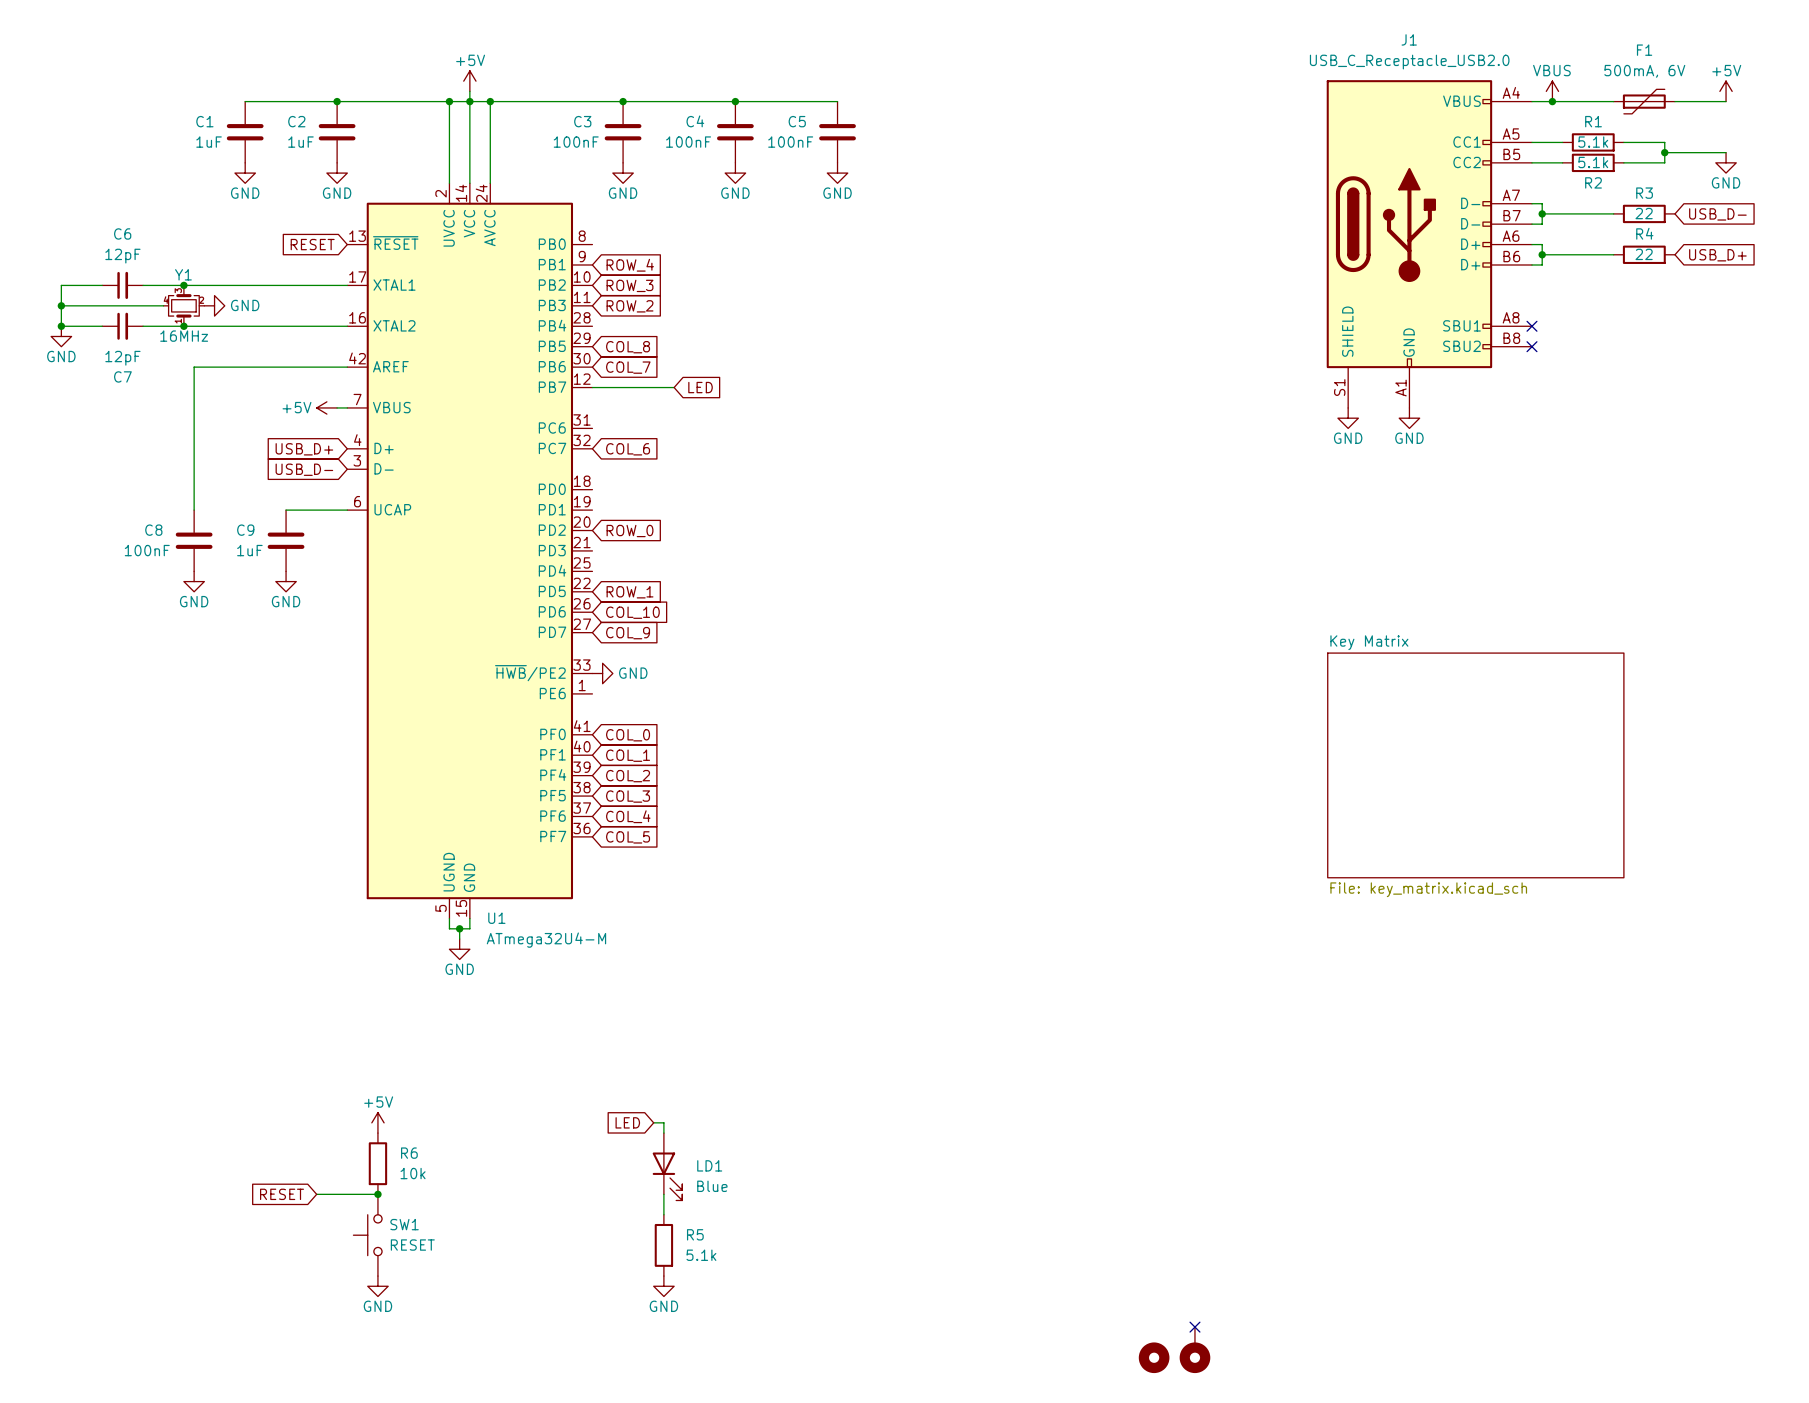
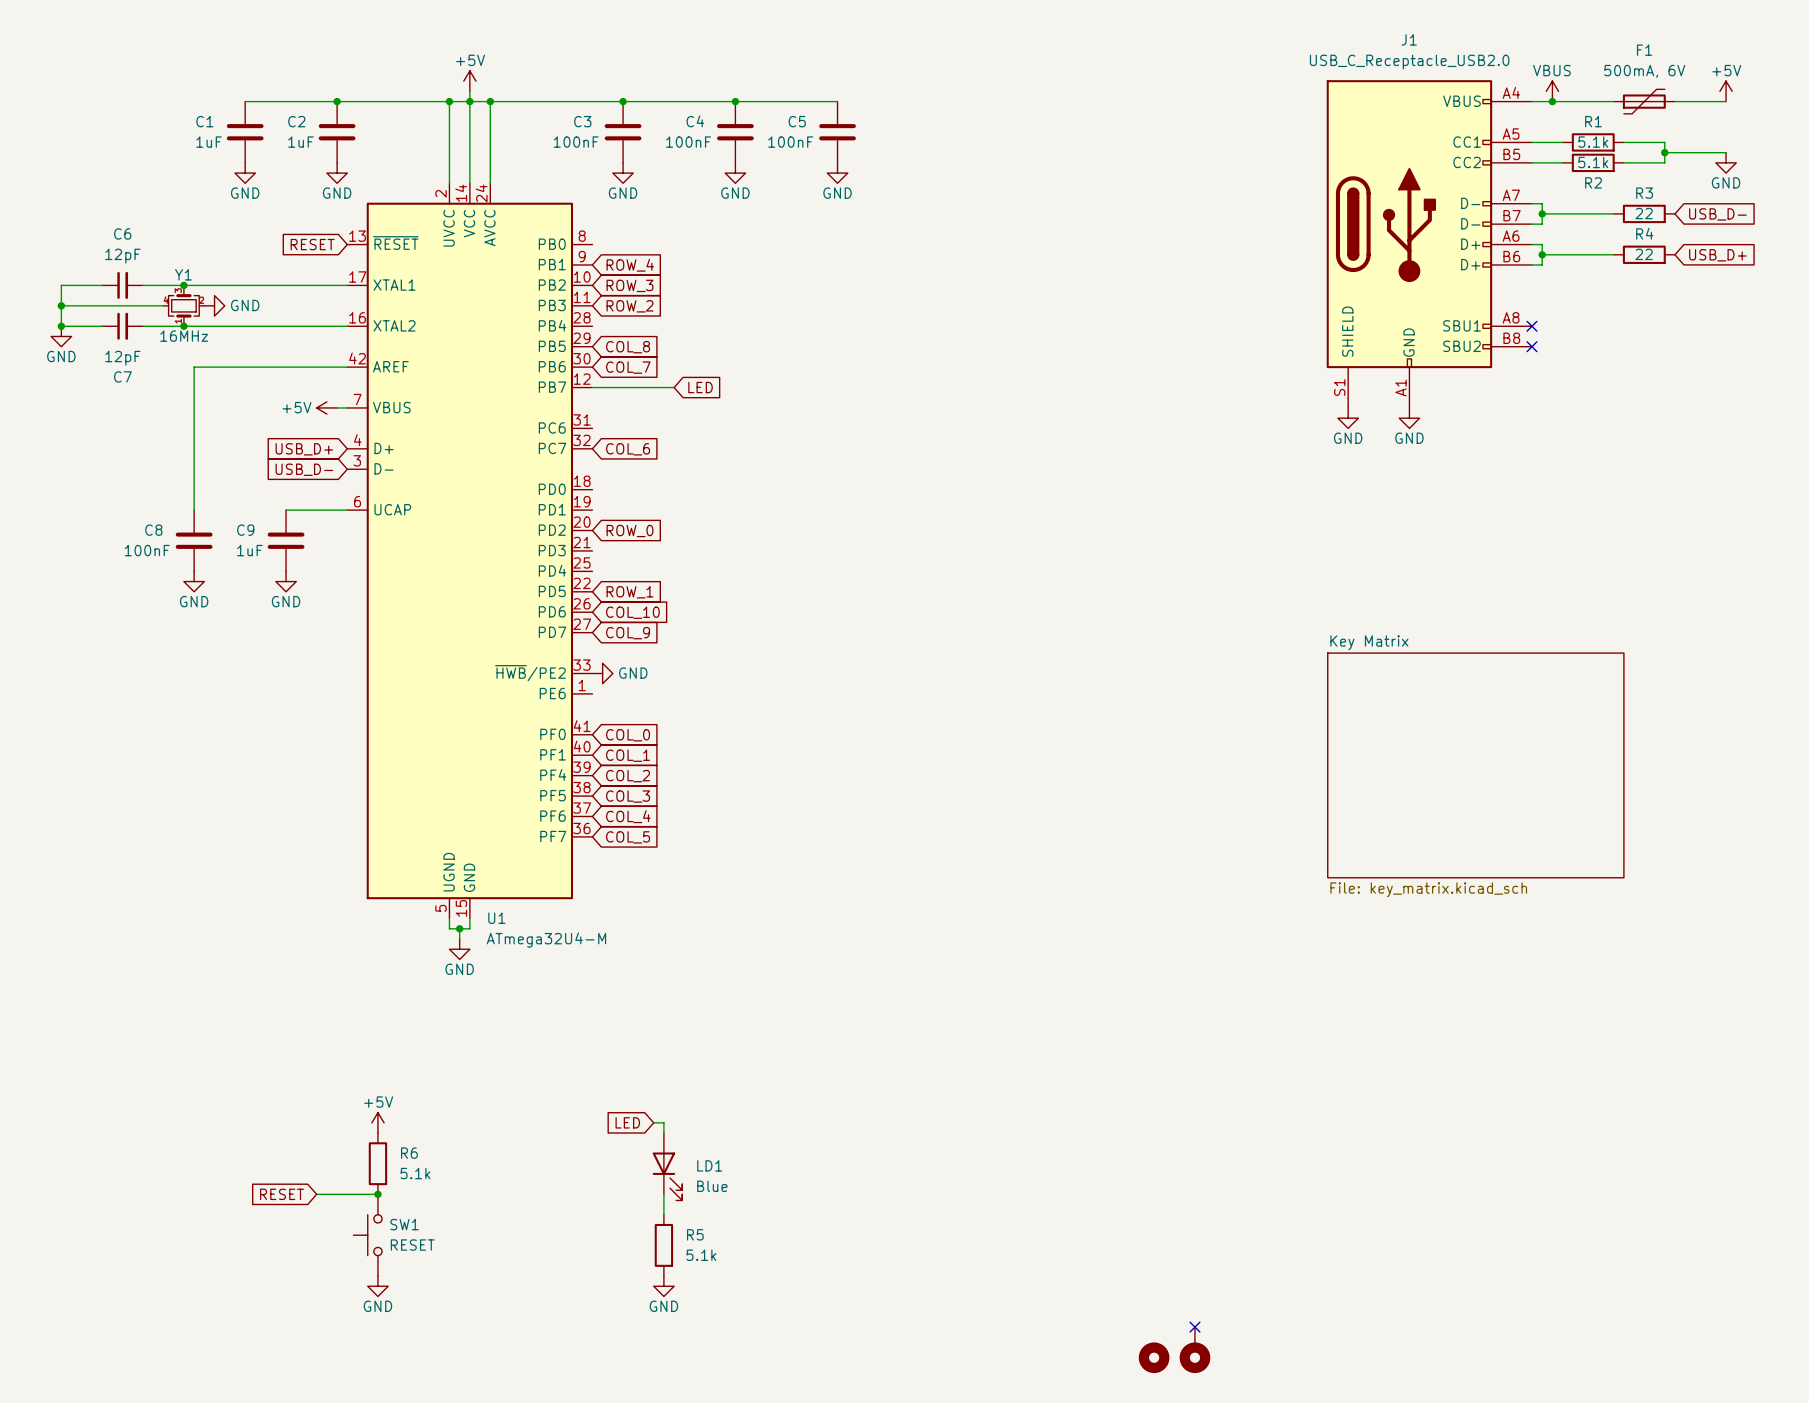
R6 value: 10k (413, 1173) -> 5.1k (415, 1173)

